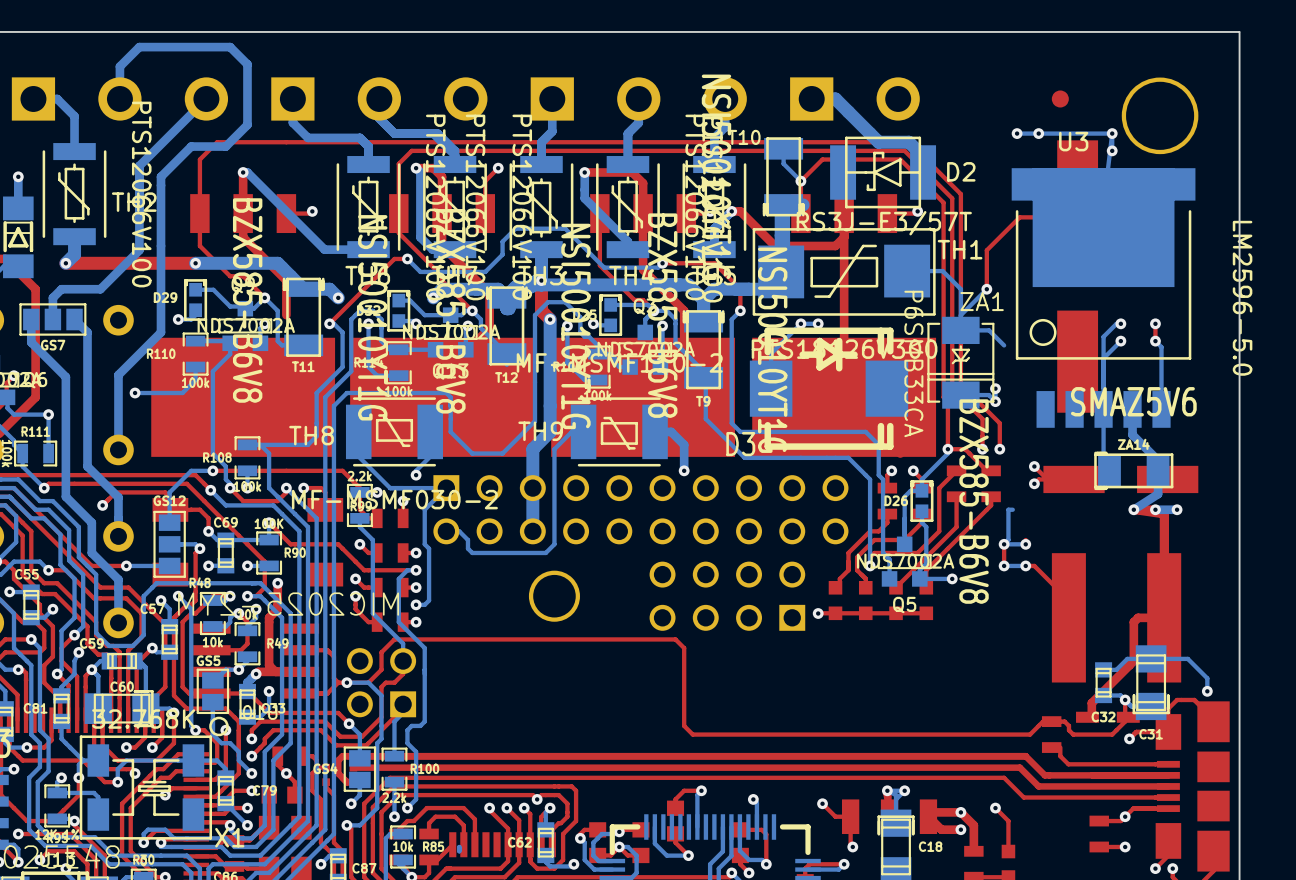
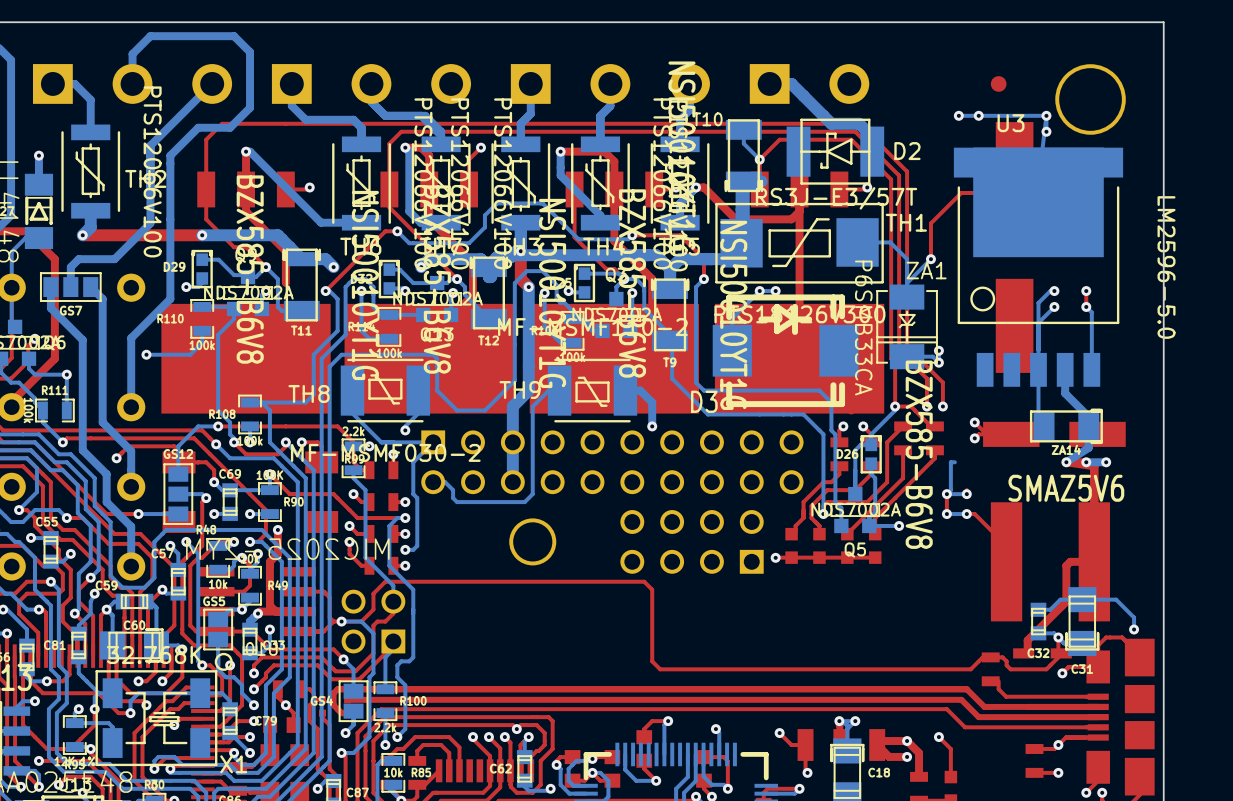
bottom track: (960, 330) (989, 330) (1004, 345) -> none
ZA14 rotation: 0° (1133, 470) -> 180° (1066, 426)
bottom track: (459, 846) (459, 851) -> none

